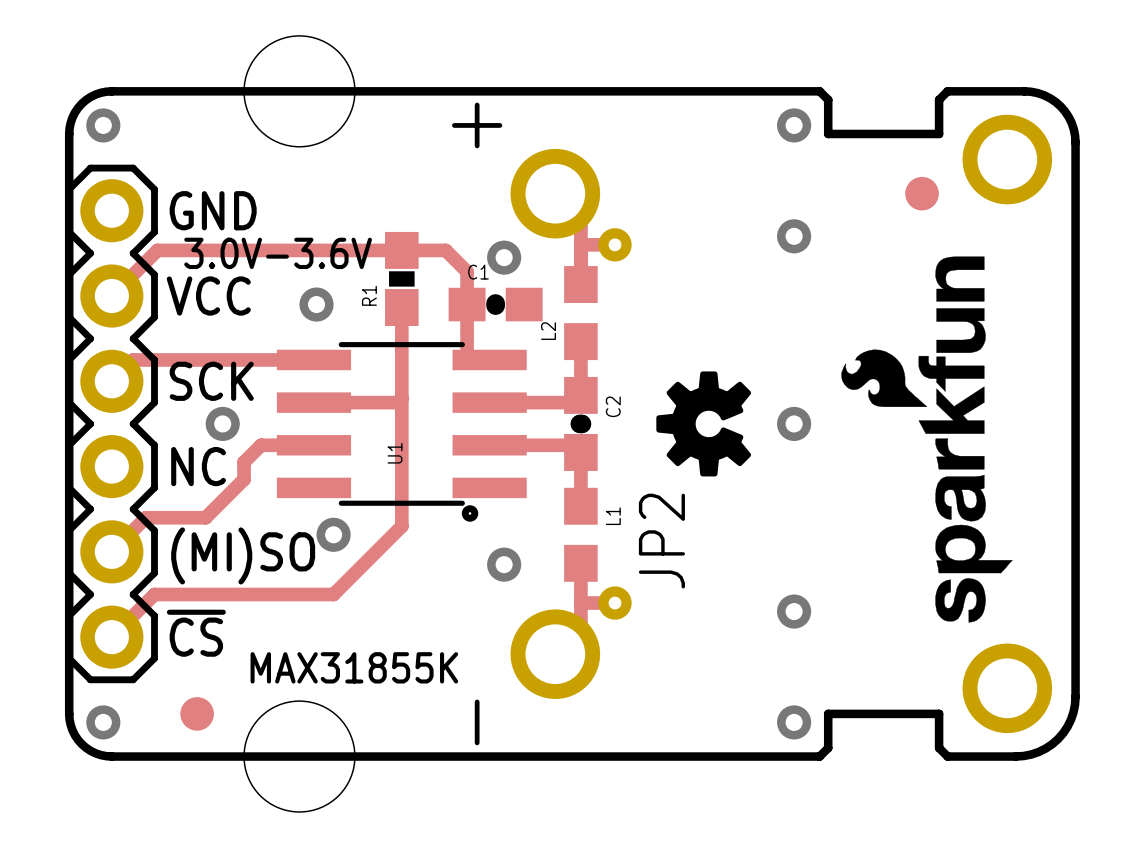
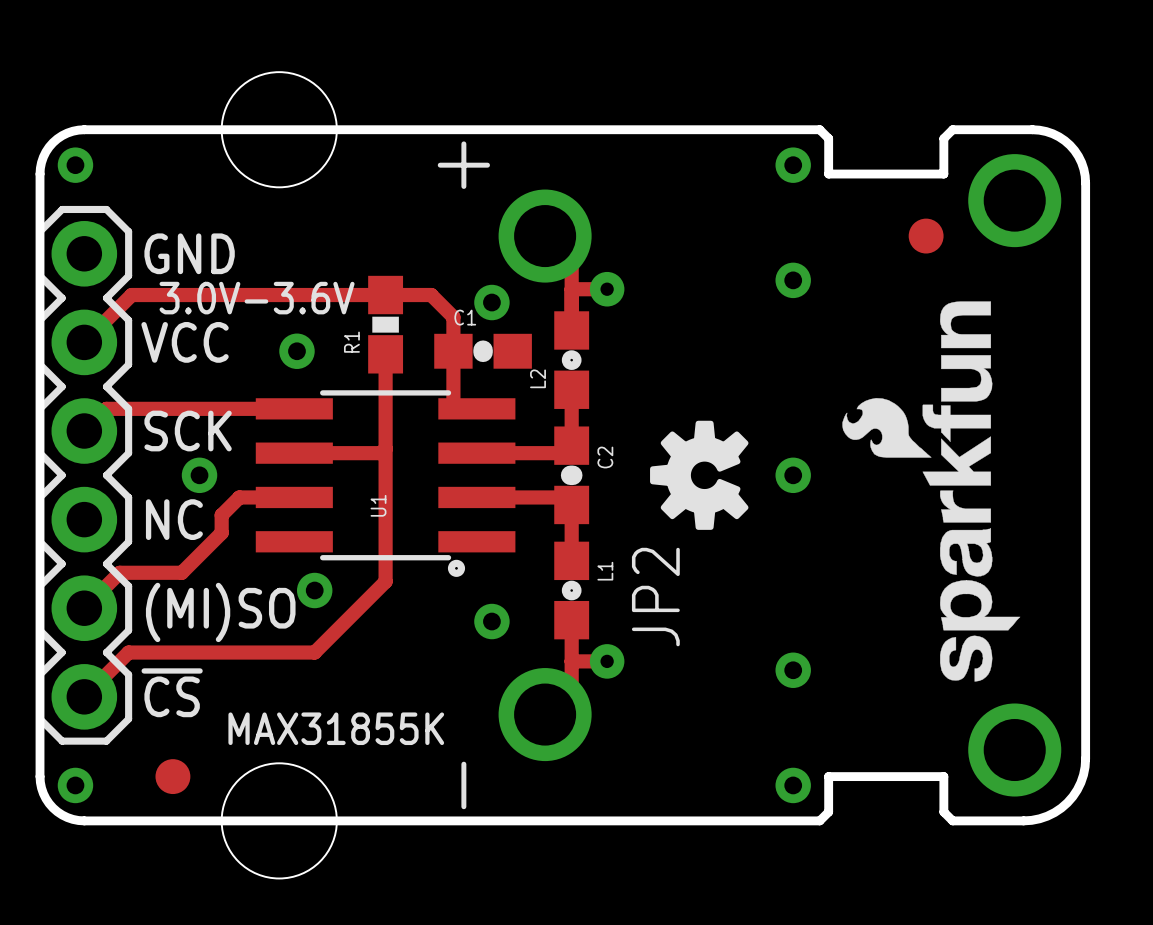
L2 footprint: [564, 266, 598, 361] -> [554, 311, 590, 409]
L1 footprint: [564, 487, 598, 582] -> [554, 541, 590, 640]

